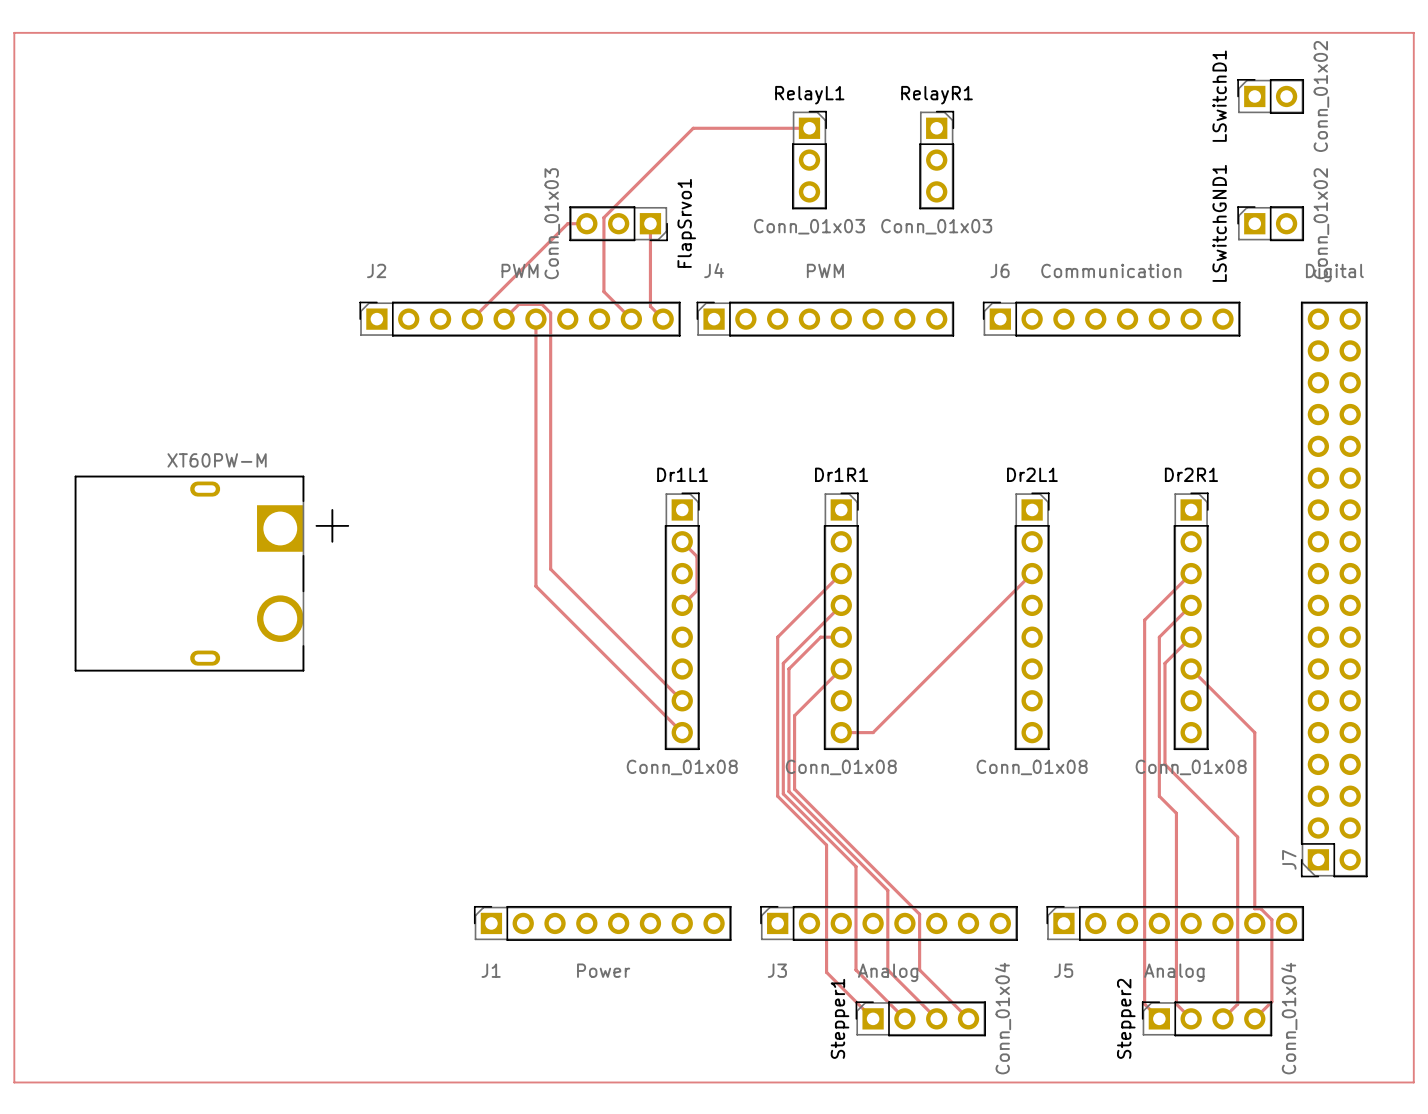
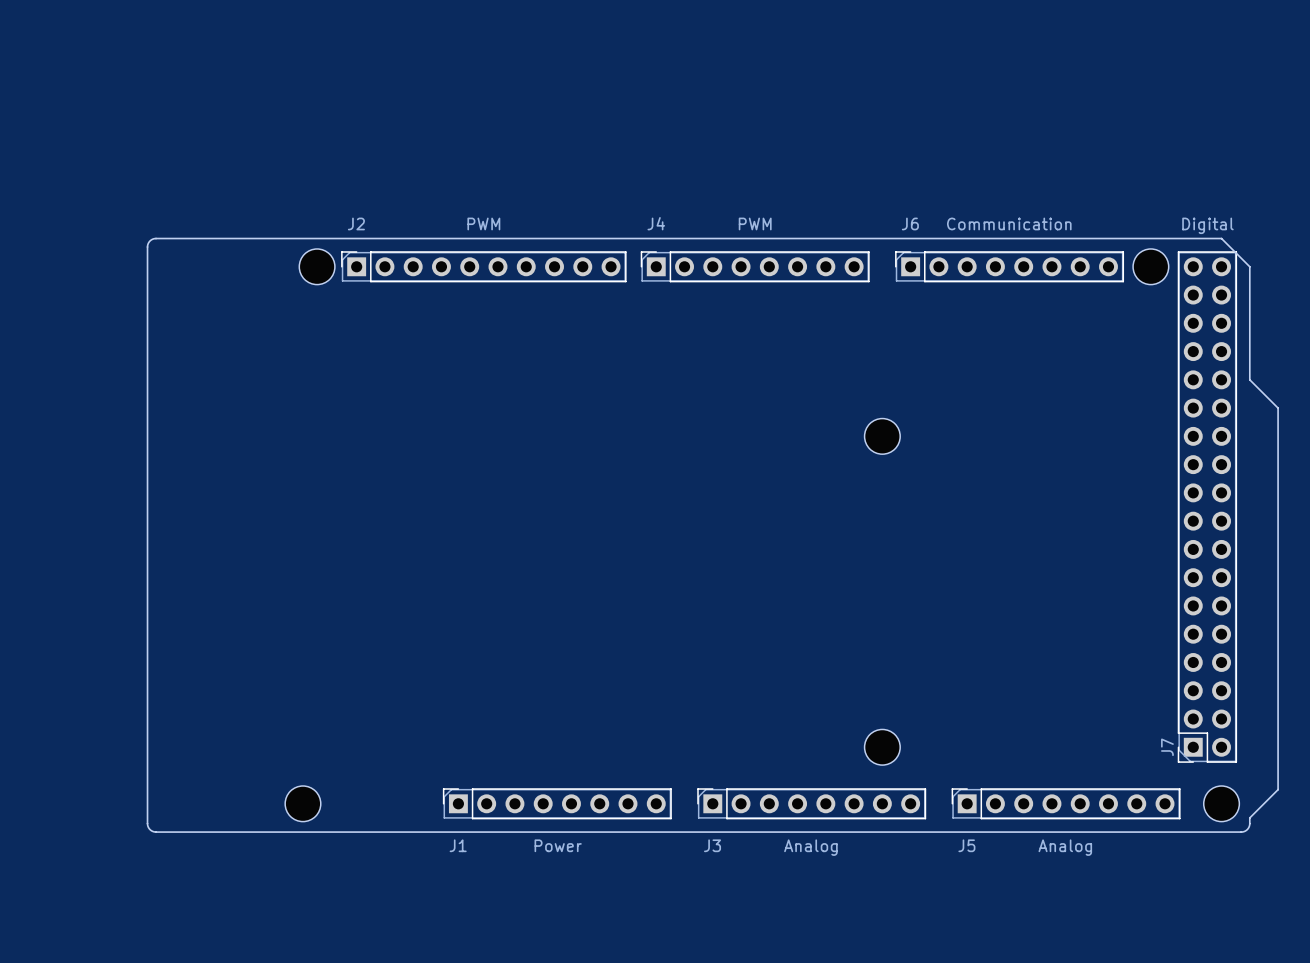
track: (14, 32) (14, 1082) (1413, 1082) (1413, 32) (14, 32) -> none
LSwitchD1: Conn_01x02 (1270, 96) -> none
track: (809, 128) (693, 128) (603, 217) (603, 291) (631, 319) -> none
RelayL1: Conn_01x03 (809, 160) -> none
RelayR1: Conn_01x03 (936, 160) -> none
track: (586, 223) (567, 223) (472, 319) -> none
FlapSrvo1: Conn_01x03 (618, 223) -> none
track: (650, 223) (650, 306) (663, 319) -> none
LSwitchGND1: Conn_01x02 (1270, 223) -> none
board edge: none -> (156, 238) (1221, 238) (1249, 266) (1249, 379) (1278, 408) (1278, 789) (1249, 817) (1248, 828) (1241, 832) (152, 831) (147, 823) (147, 247) (150, 241) (156, 238)
part: none -> (317, 266)
track: (504, 319) (518, 304) (542, 304) (550, 313) (550, 569) (682, 700) -> none
track: (535, 319) (535, 586) (682, 732) -> none
part: none -> (1150, 266)
part: none -> (882, 436)
track: (682, 541) (696, 556) (696, 590) (682, 605) -> none
part: XT60PW-M (211, 573) -> none
track: (841, 573) (777, 637) (777, 796) (826, 845) (826, 972) (873, 1018) -> none
track: (1032, 573) (873, 732) (841, 732) -> none
track: (1191, 573) (1144, 620) (1144, 1004) (1159, 1018) -> none
track: (841, 605) (783, 663) (783, 793) (856, 866) (856, 969) (904, 1018) -> none
track: (1191, 605) (1159, 637) (1159, 796) (1176, 813) (1176, 1004) (1191, 1018) -> none
Dr1L1: Conn_01x08 (682, 621) -> none
Dr1R1: Conn_01x08 (841, 621) -> none
Dr2L1: Conn_01x08 (1032, 621) -> none
Dr2R1: Conn_01x08 (1191, 621) -> none
track: (841, 637) (820, 637) (788, 668) (788, 791) (887, 890) (887, 969) (936, 1018) -> none
track: (1191, 637) (1164, 663) (1164, 764) (1237, 837) (1237, 1004) (1222, 1018) -> none
track: (841, 668) (794, 715) (794, 789) (919, 914) (919, 969) (968, 1018) -> none
track: (1191, 668) (1254, 732) (1254, 908) (1260, 908) (1271, 919) (1271, 1001) (1254, 1018) -> none
part: none -> (882, 747)
part: none -> (302, 803)
part: none -> (1221, 803)
Stepper1: Conn_01x04 (920, 1018) -> none
Stepper2: Conn_01x04 (1207, 1018) -> none

